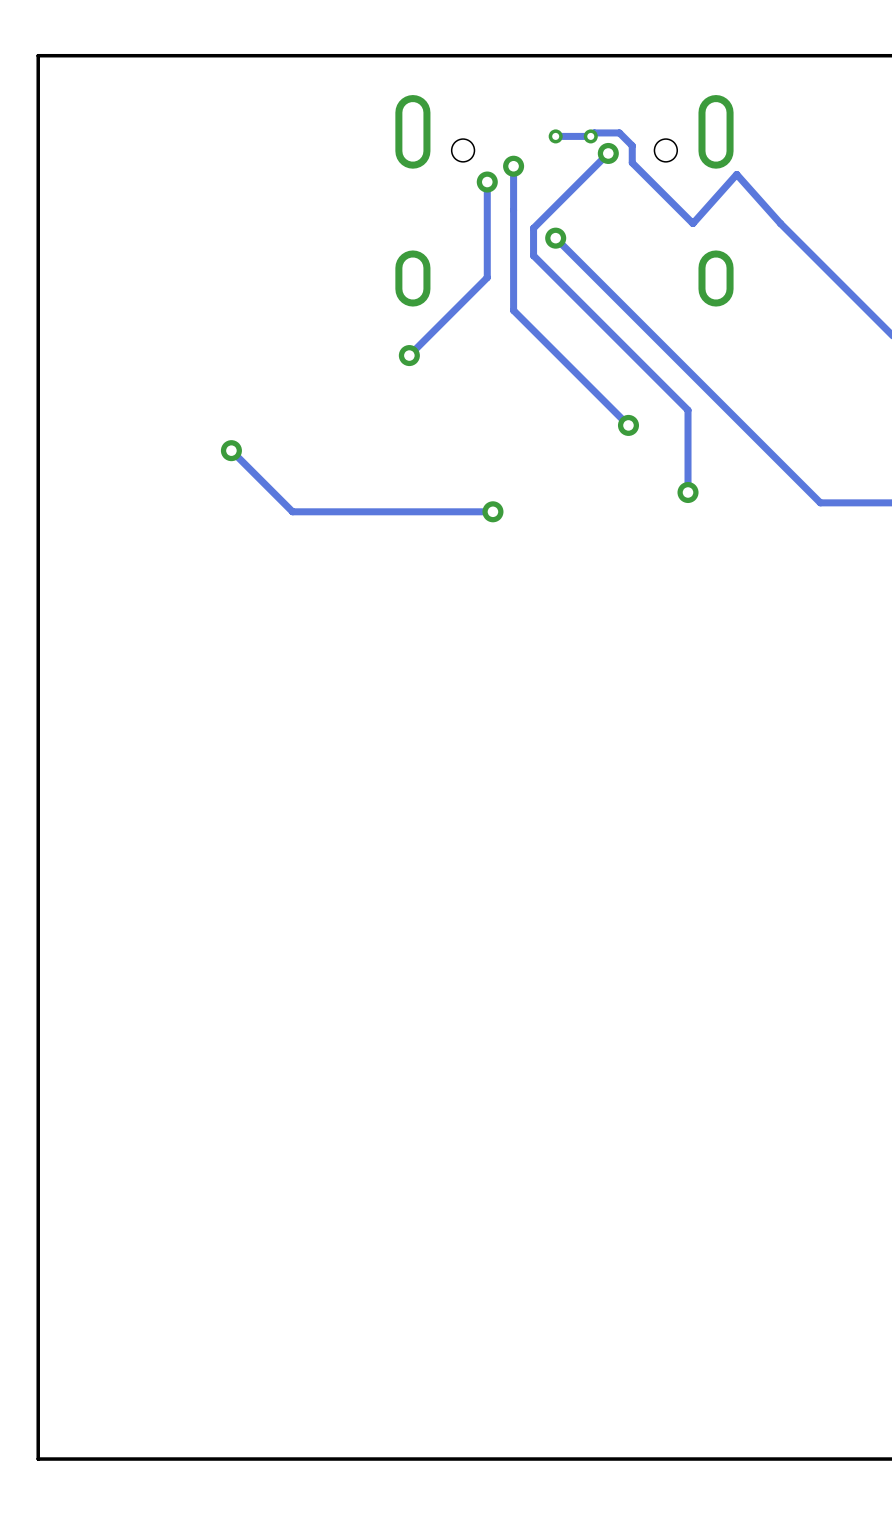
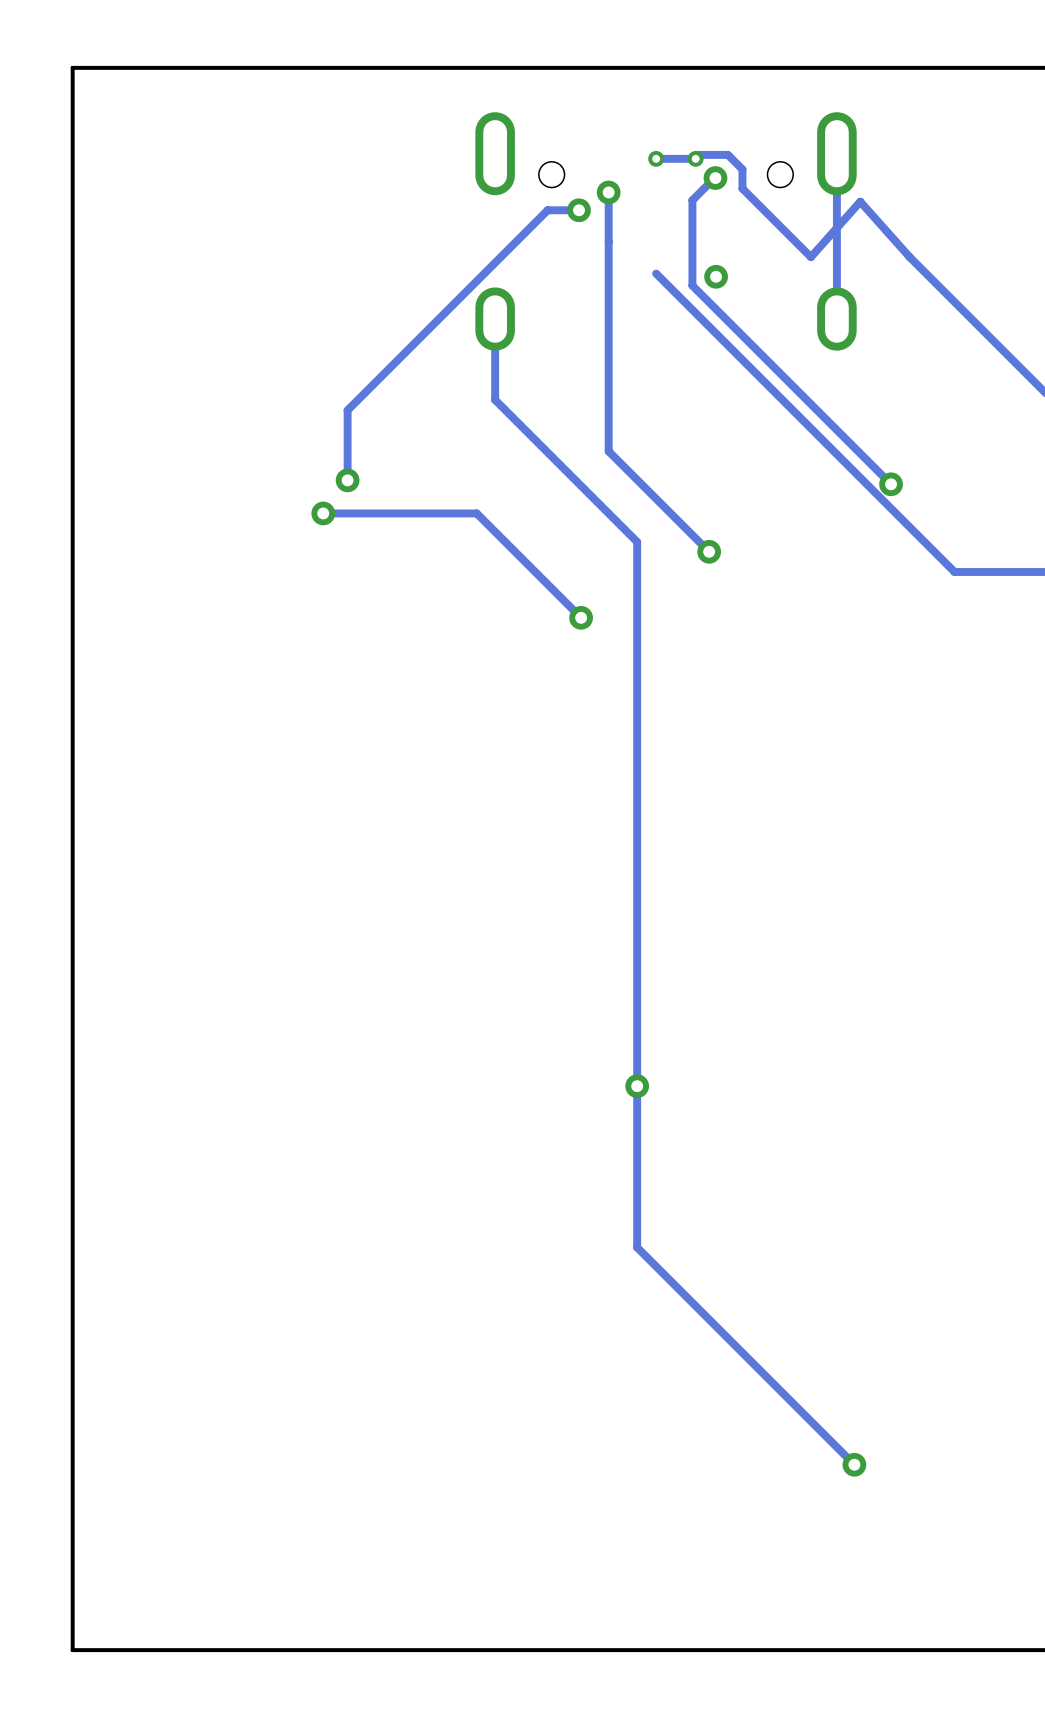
track: none -> (836, 153) (836, 319)
track: (608, 153) (533, 228) (533, 255) (688, 410) (688, 492) -> (715, 177) (692, 200) (692, 285) (891, 484)
track: (487, 182) (487, 277) (409, 355) -> (579, 210) (547, 210) (347, 410) (347, 480)
via position: (555, 238) -> (716, 276)
track: none -> (495, 319) (495, 399) (637, 541) (637, 1247) (854, 1464)
track: (513, 310) (628, 425) -> (608, 355) (608, 451) (709, 551)
via: (409, 355) -> none
via: none -> (347, 480)
via: (628, 425) -> none
via: none -> (891, 484)
track: (231, 450) (292, 511) (492, 511) -> none
via: (231, 450) -> none
track: none -> (323, 513) (476, 513) (581, 617)
via: none -> (323, 513)
via: none -> (709, 551)
via: (688, 492) -> none
via position: (492, 511) -> (581, 617)
via: none -> (637, 1086)
via: none -> (854, 1464)

